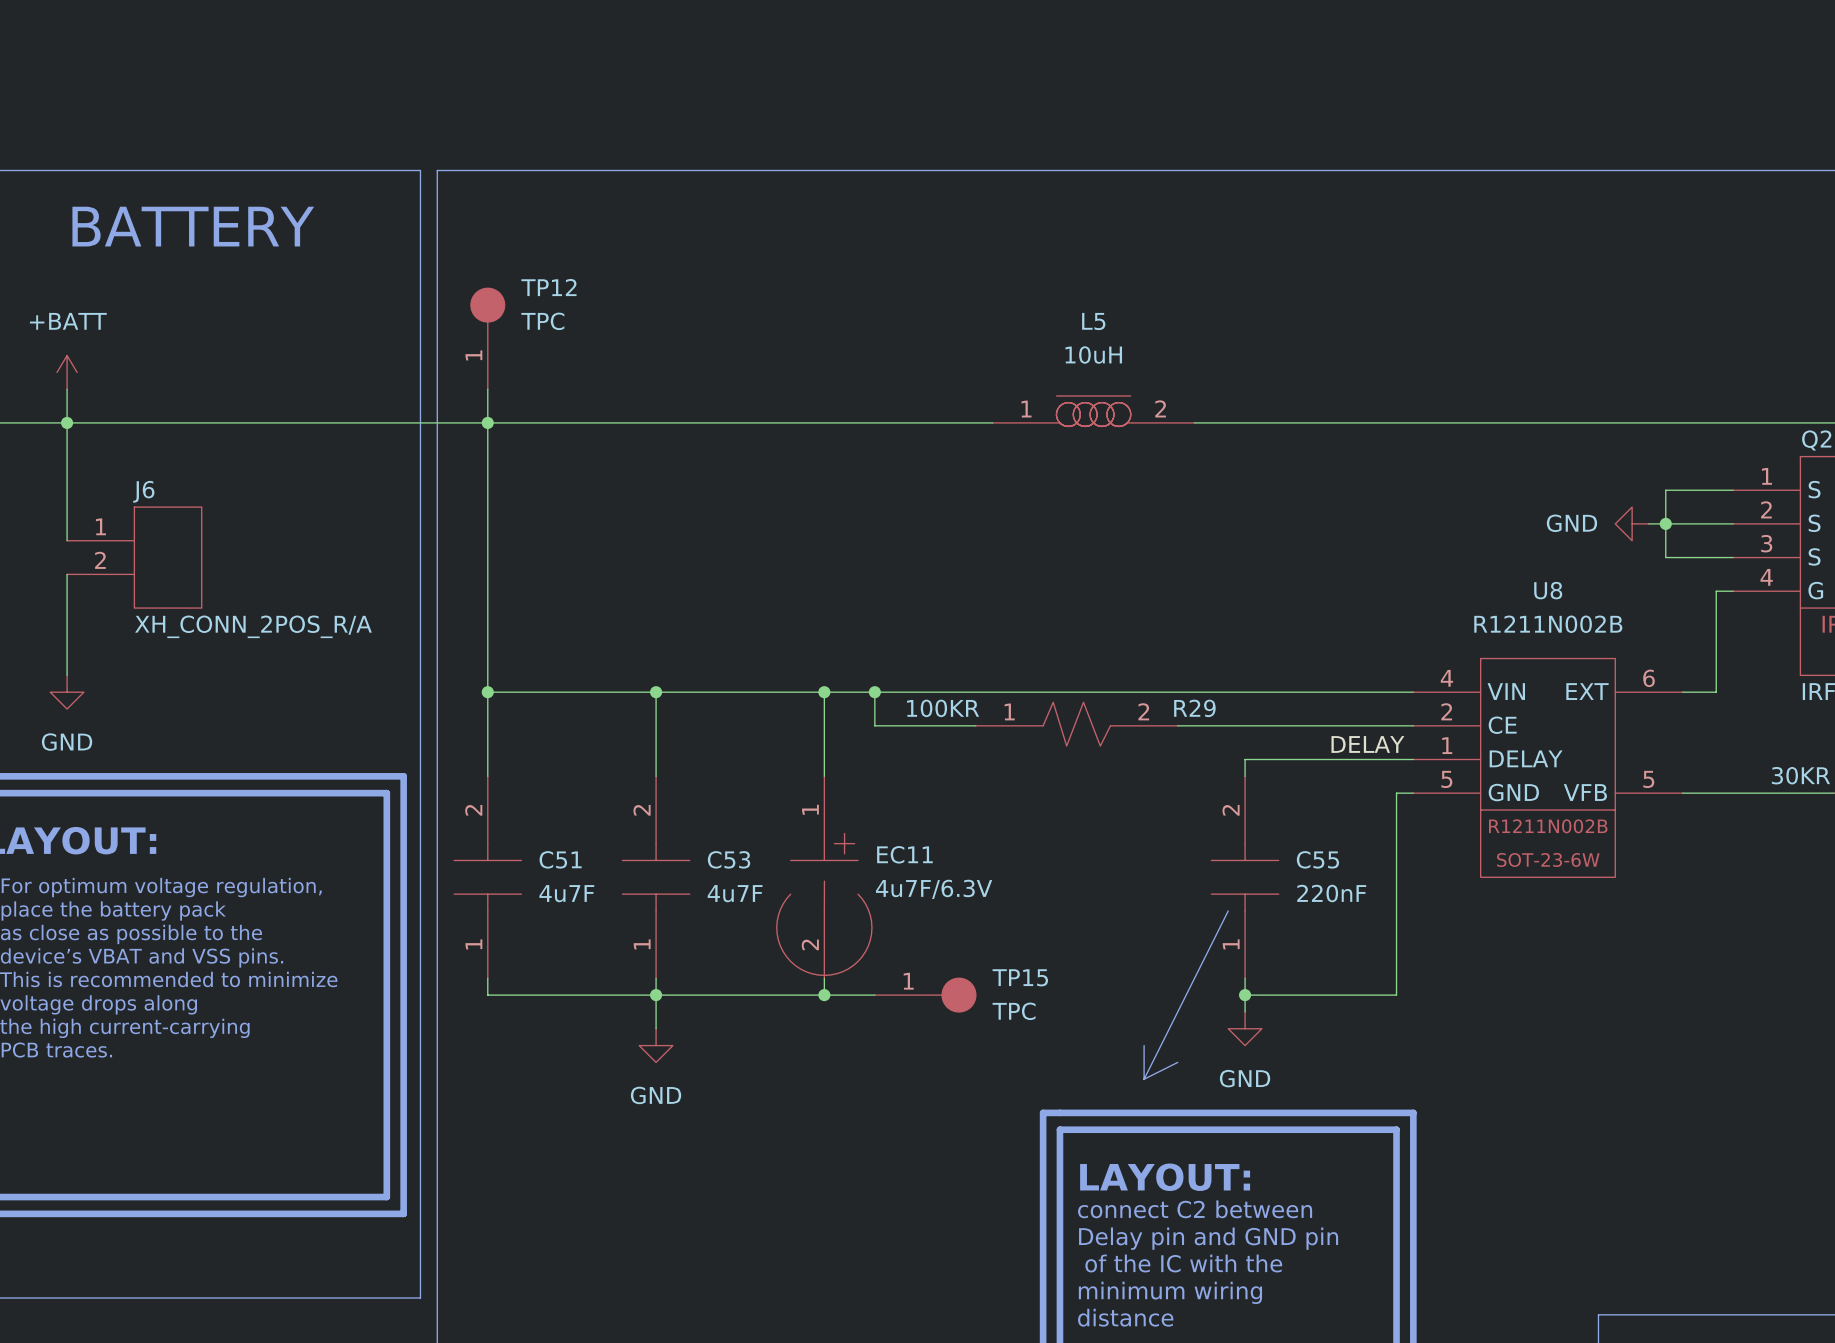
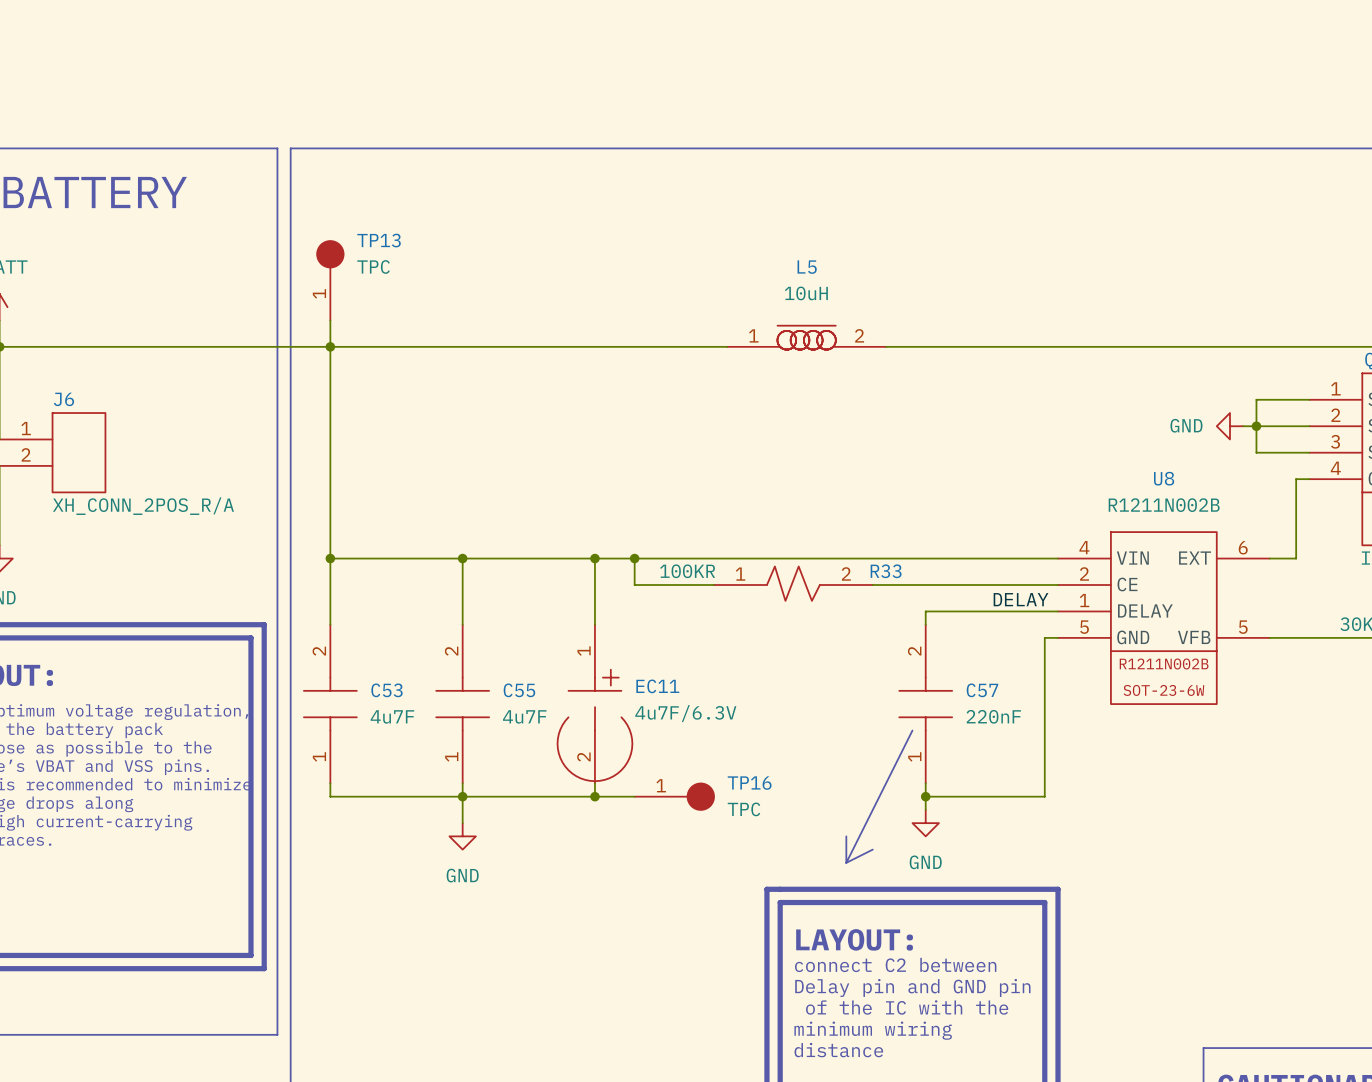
TP12 name: TP12 (548, 287) -> TP13 (379, 240)
R29 name: R29 (1194, 708) -> R33 (886, 571)
C51 name: C51 (560, 859) -> C53 (387, 690)
C53 name: C53 (729, 859) -> C55 (519, 690)
C55 name: C55 (1317, 859) -> C57 (982, 690)
TP15 name: TP15 (1020, 977) -> TP16 (749, 783)

